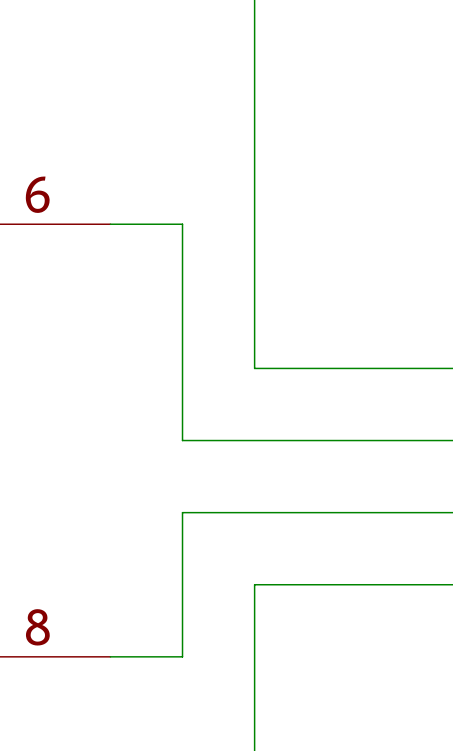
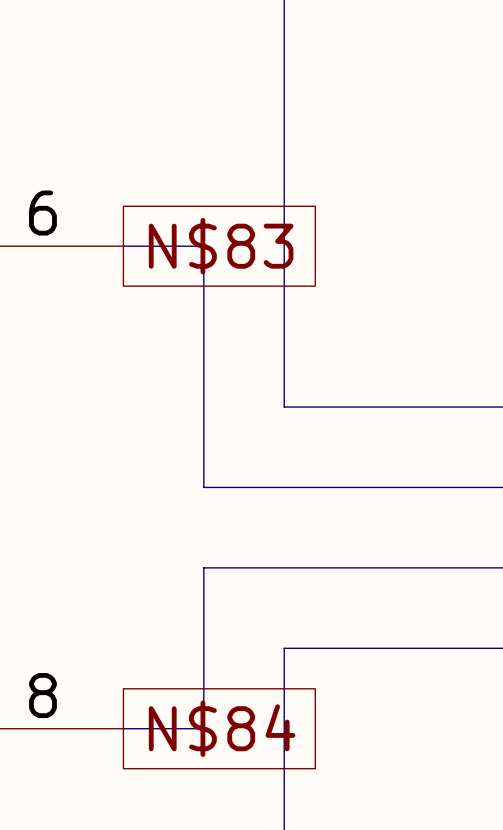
global label: none -> N$83 (221, 246)
global label: none -> N$84 (222, 728)

